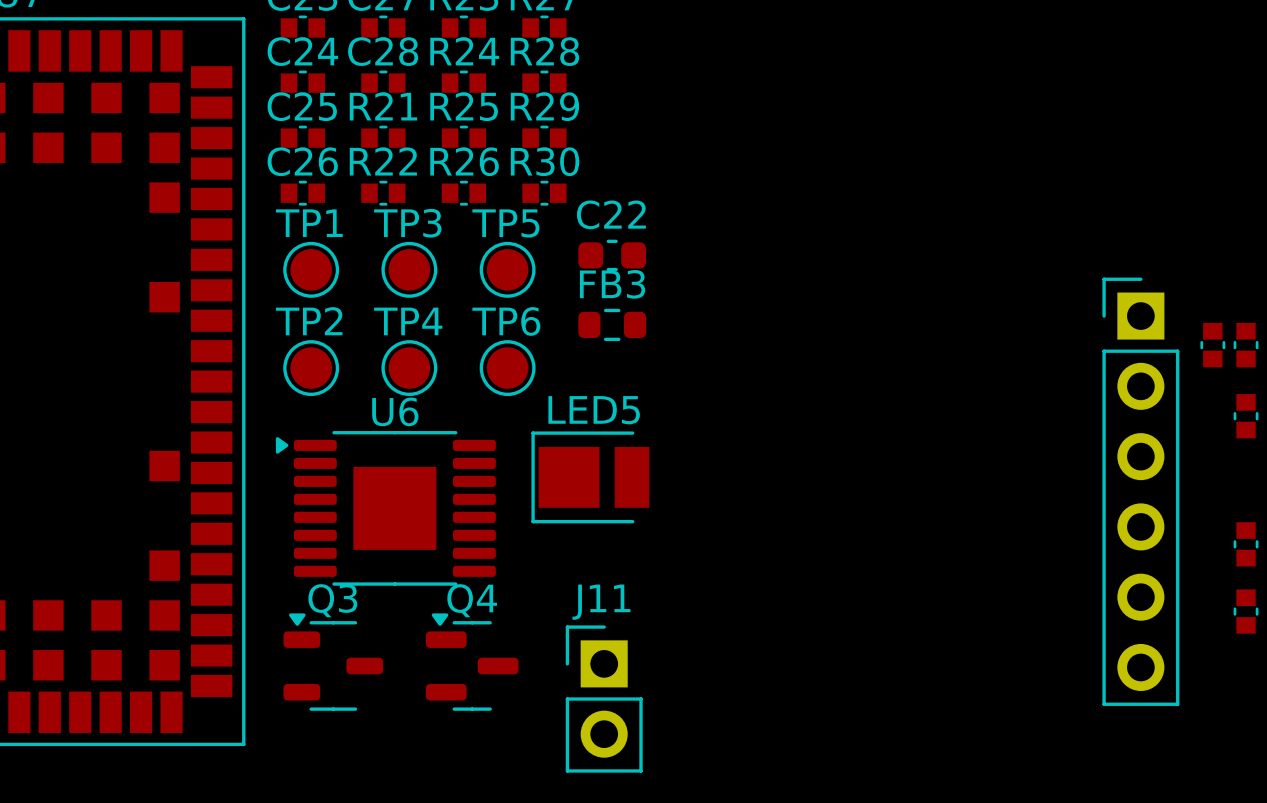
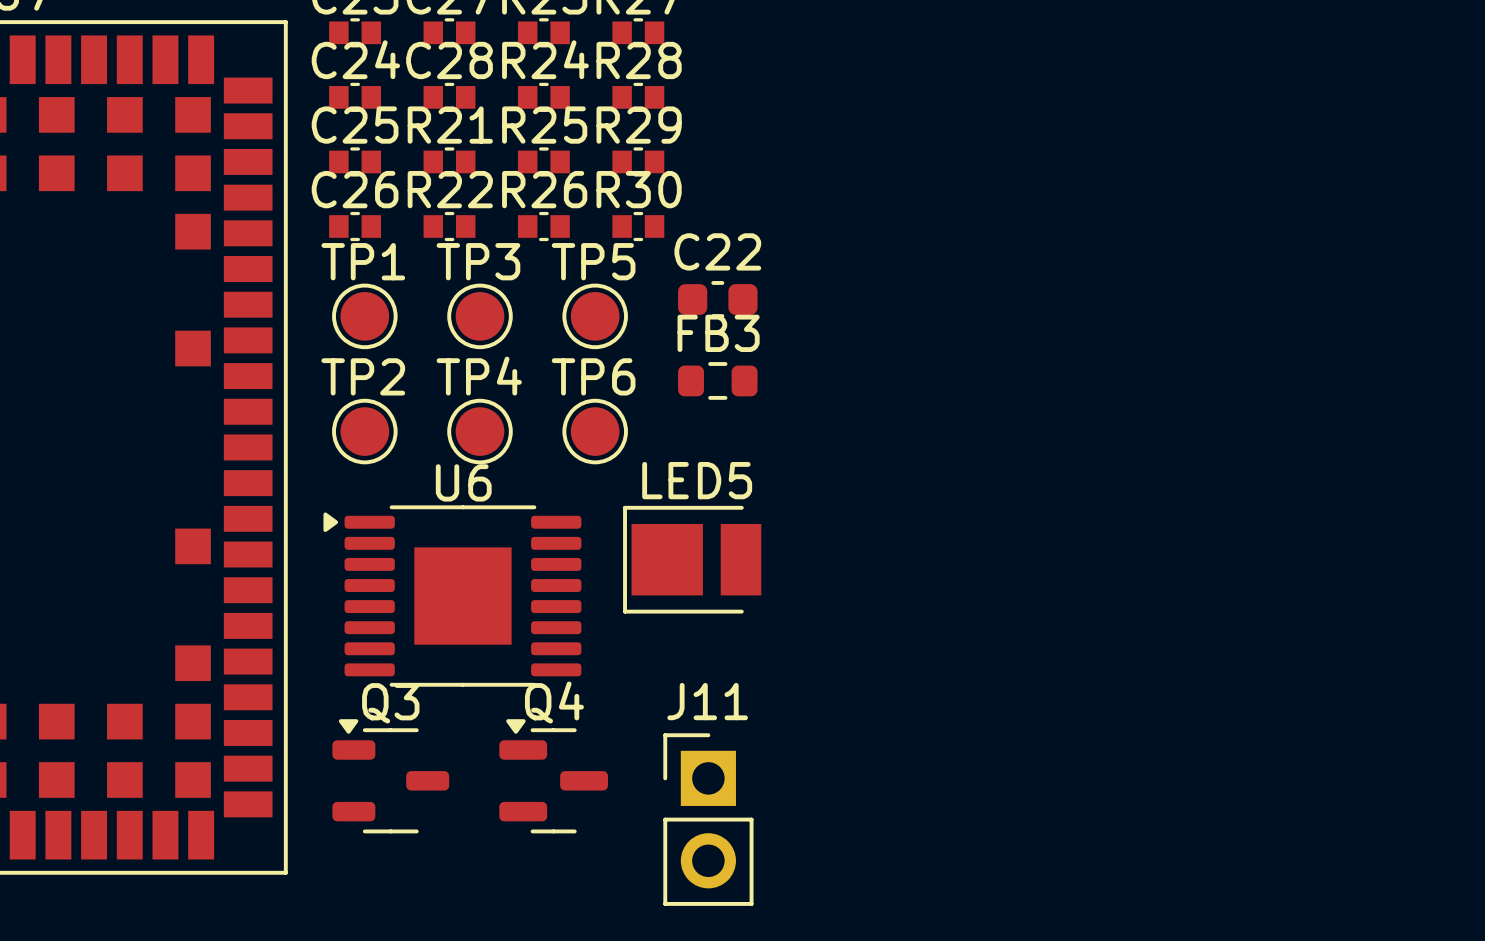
part: (1212, 345) -> none
part: (1246, 345) -> none
part: (1246, 416) -> none
part: (1140, 491) -> none
part: (1246, 544) -> none
part: (1246, 611) -> none

